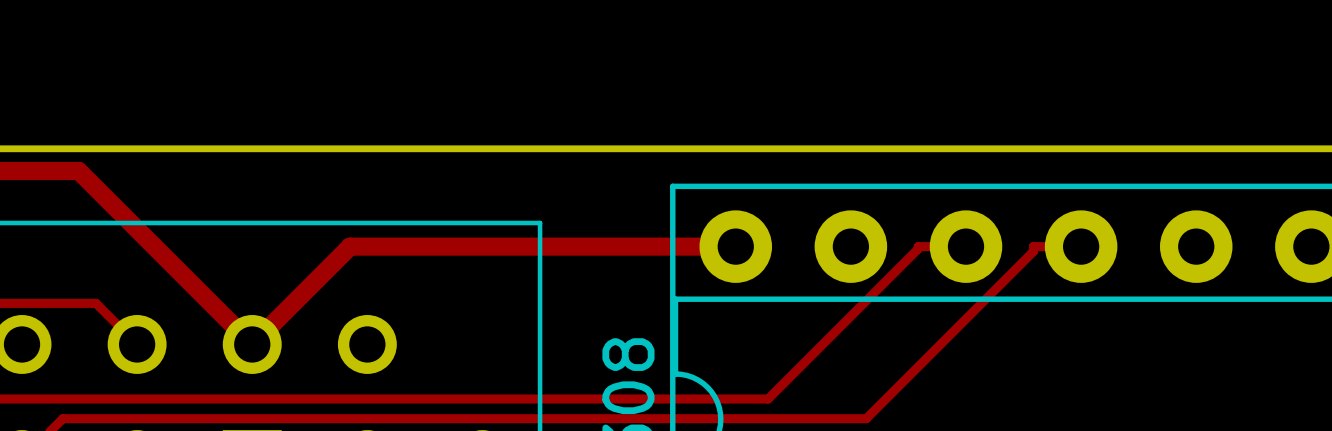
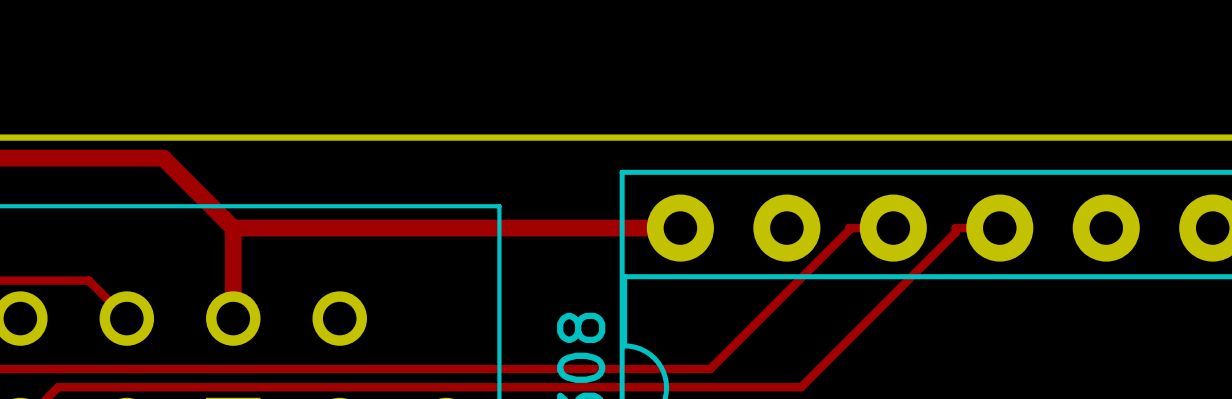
track: (78, 171) (252, 344) (350, 246) -> (72, 158) (163, 158) (233, 228)
track: none -> (233, 228) (233, 318)
track: none -> (233, 228) (323, 228)

